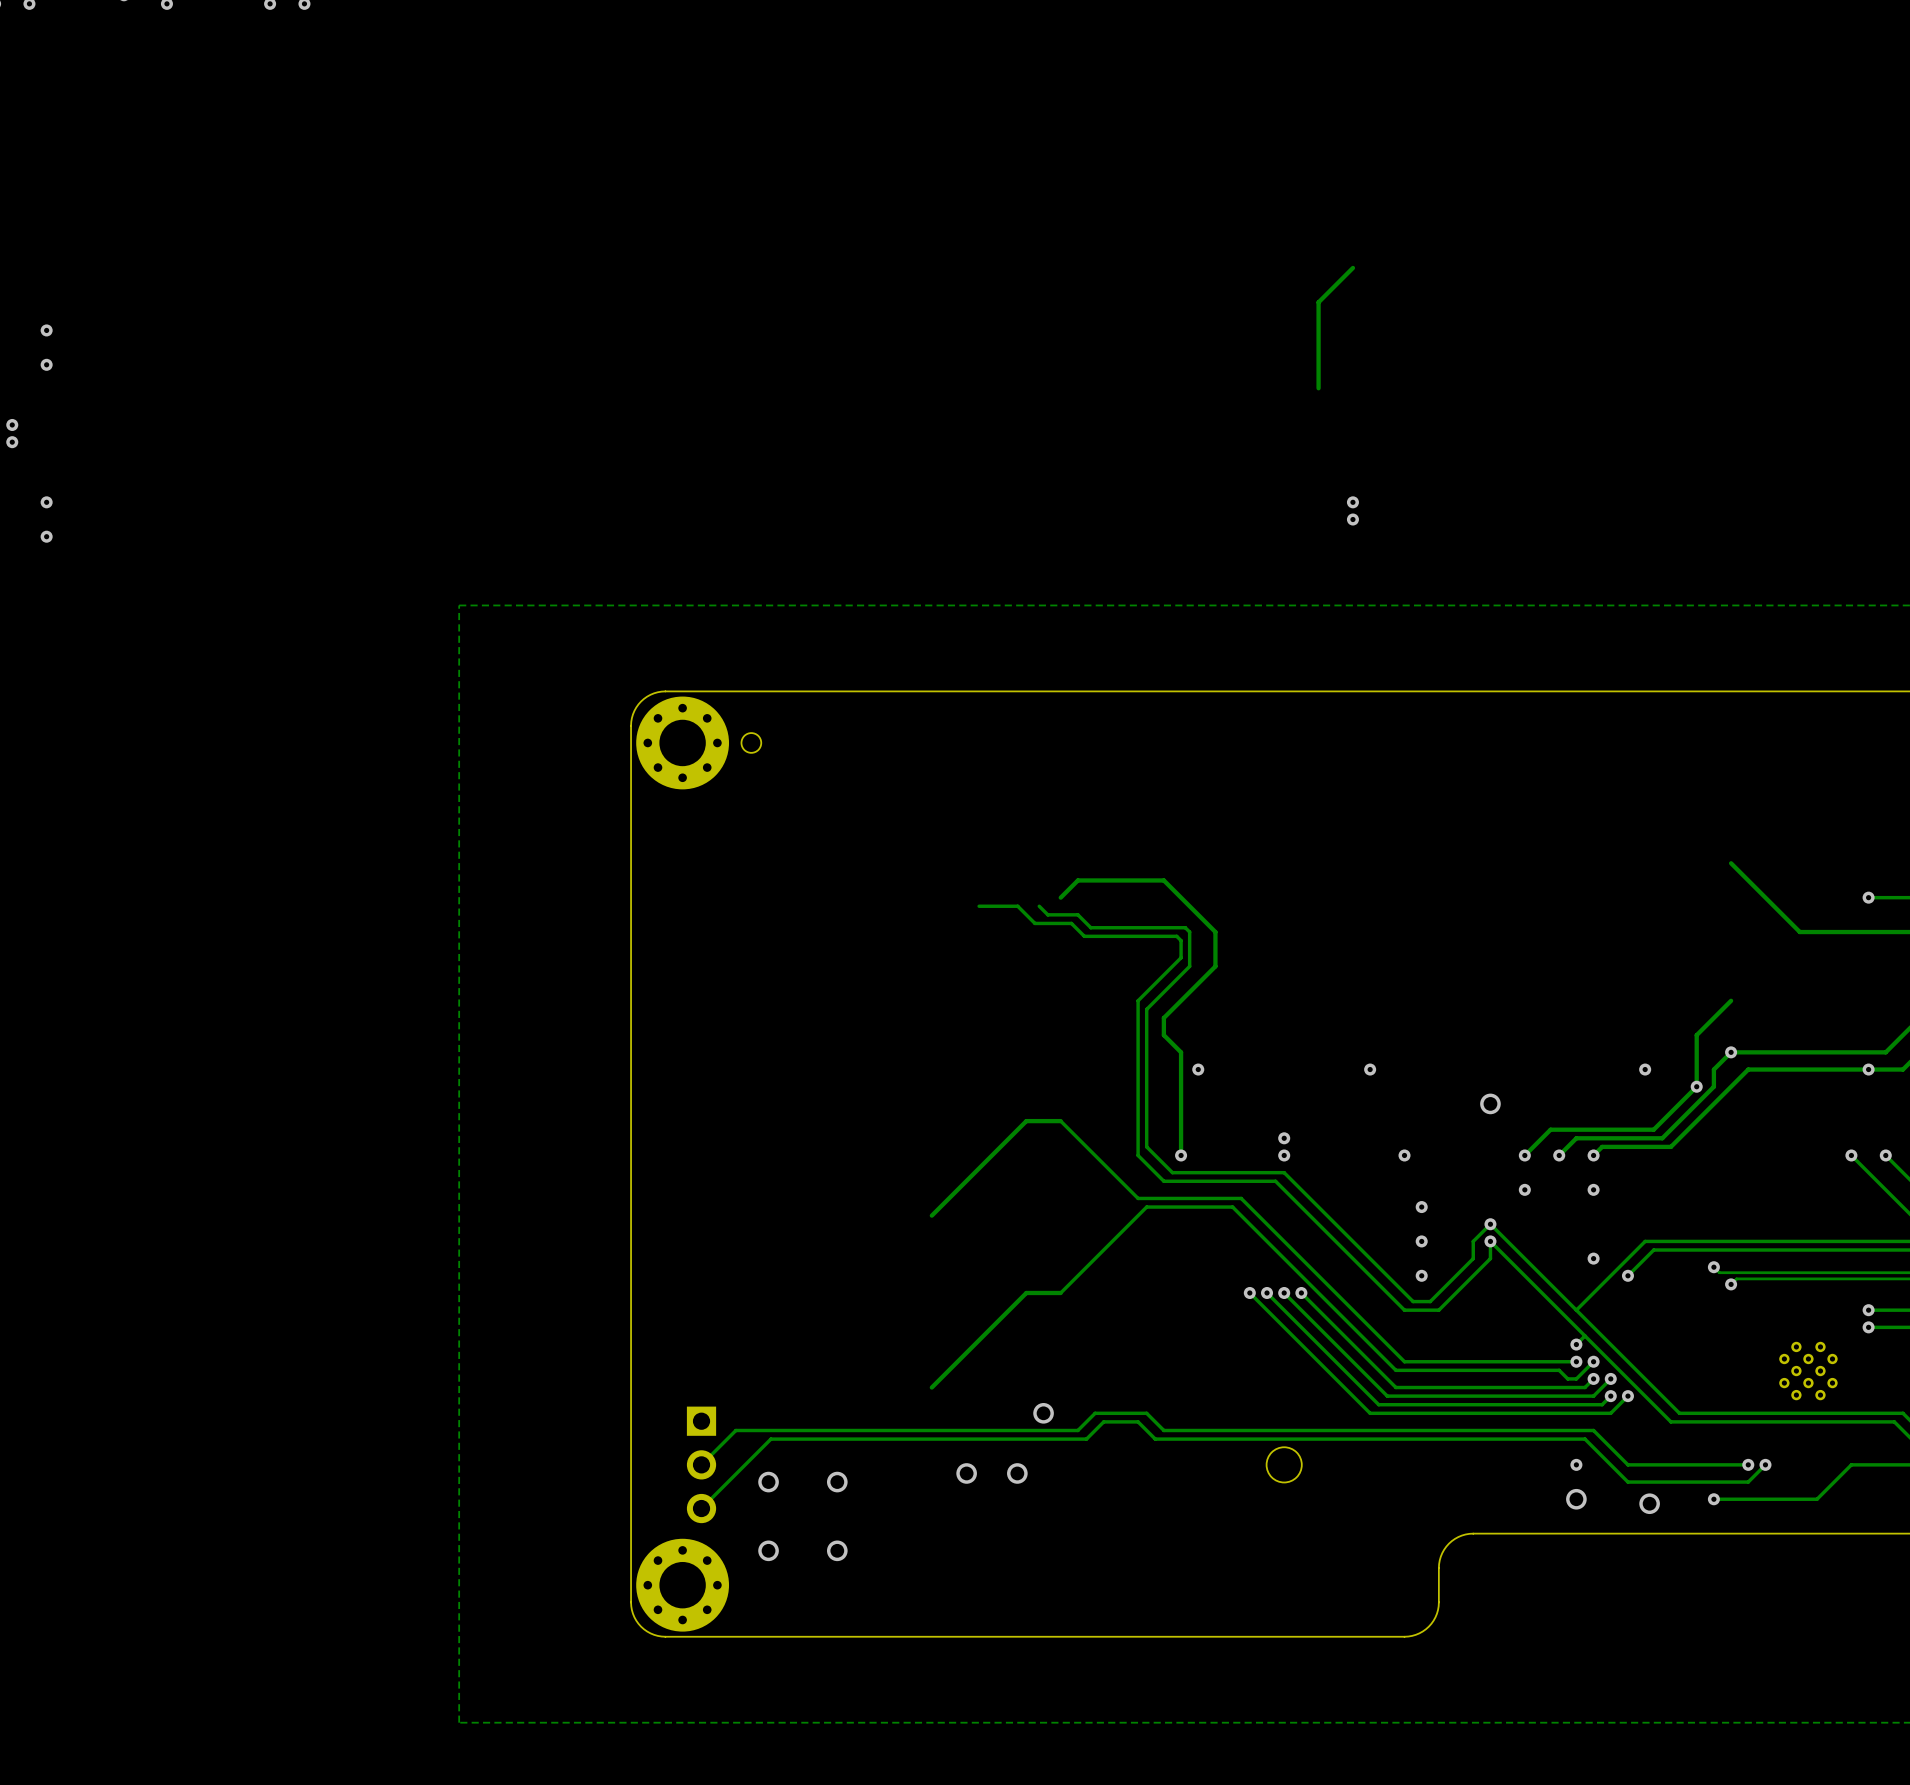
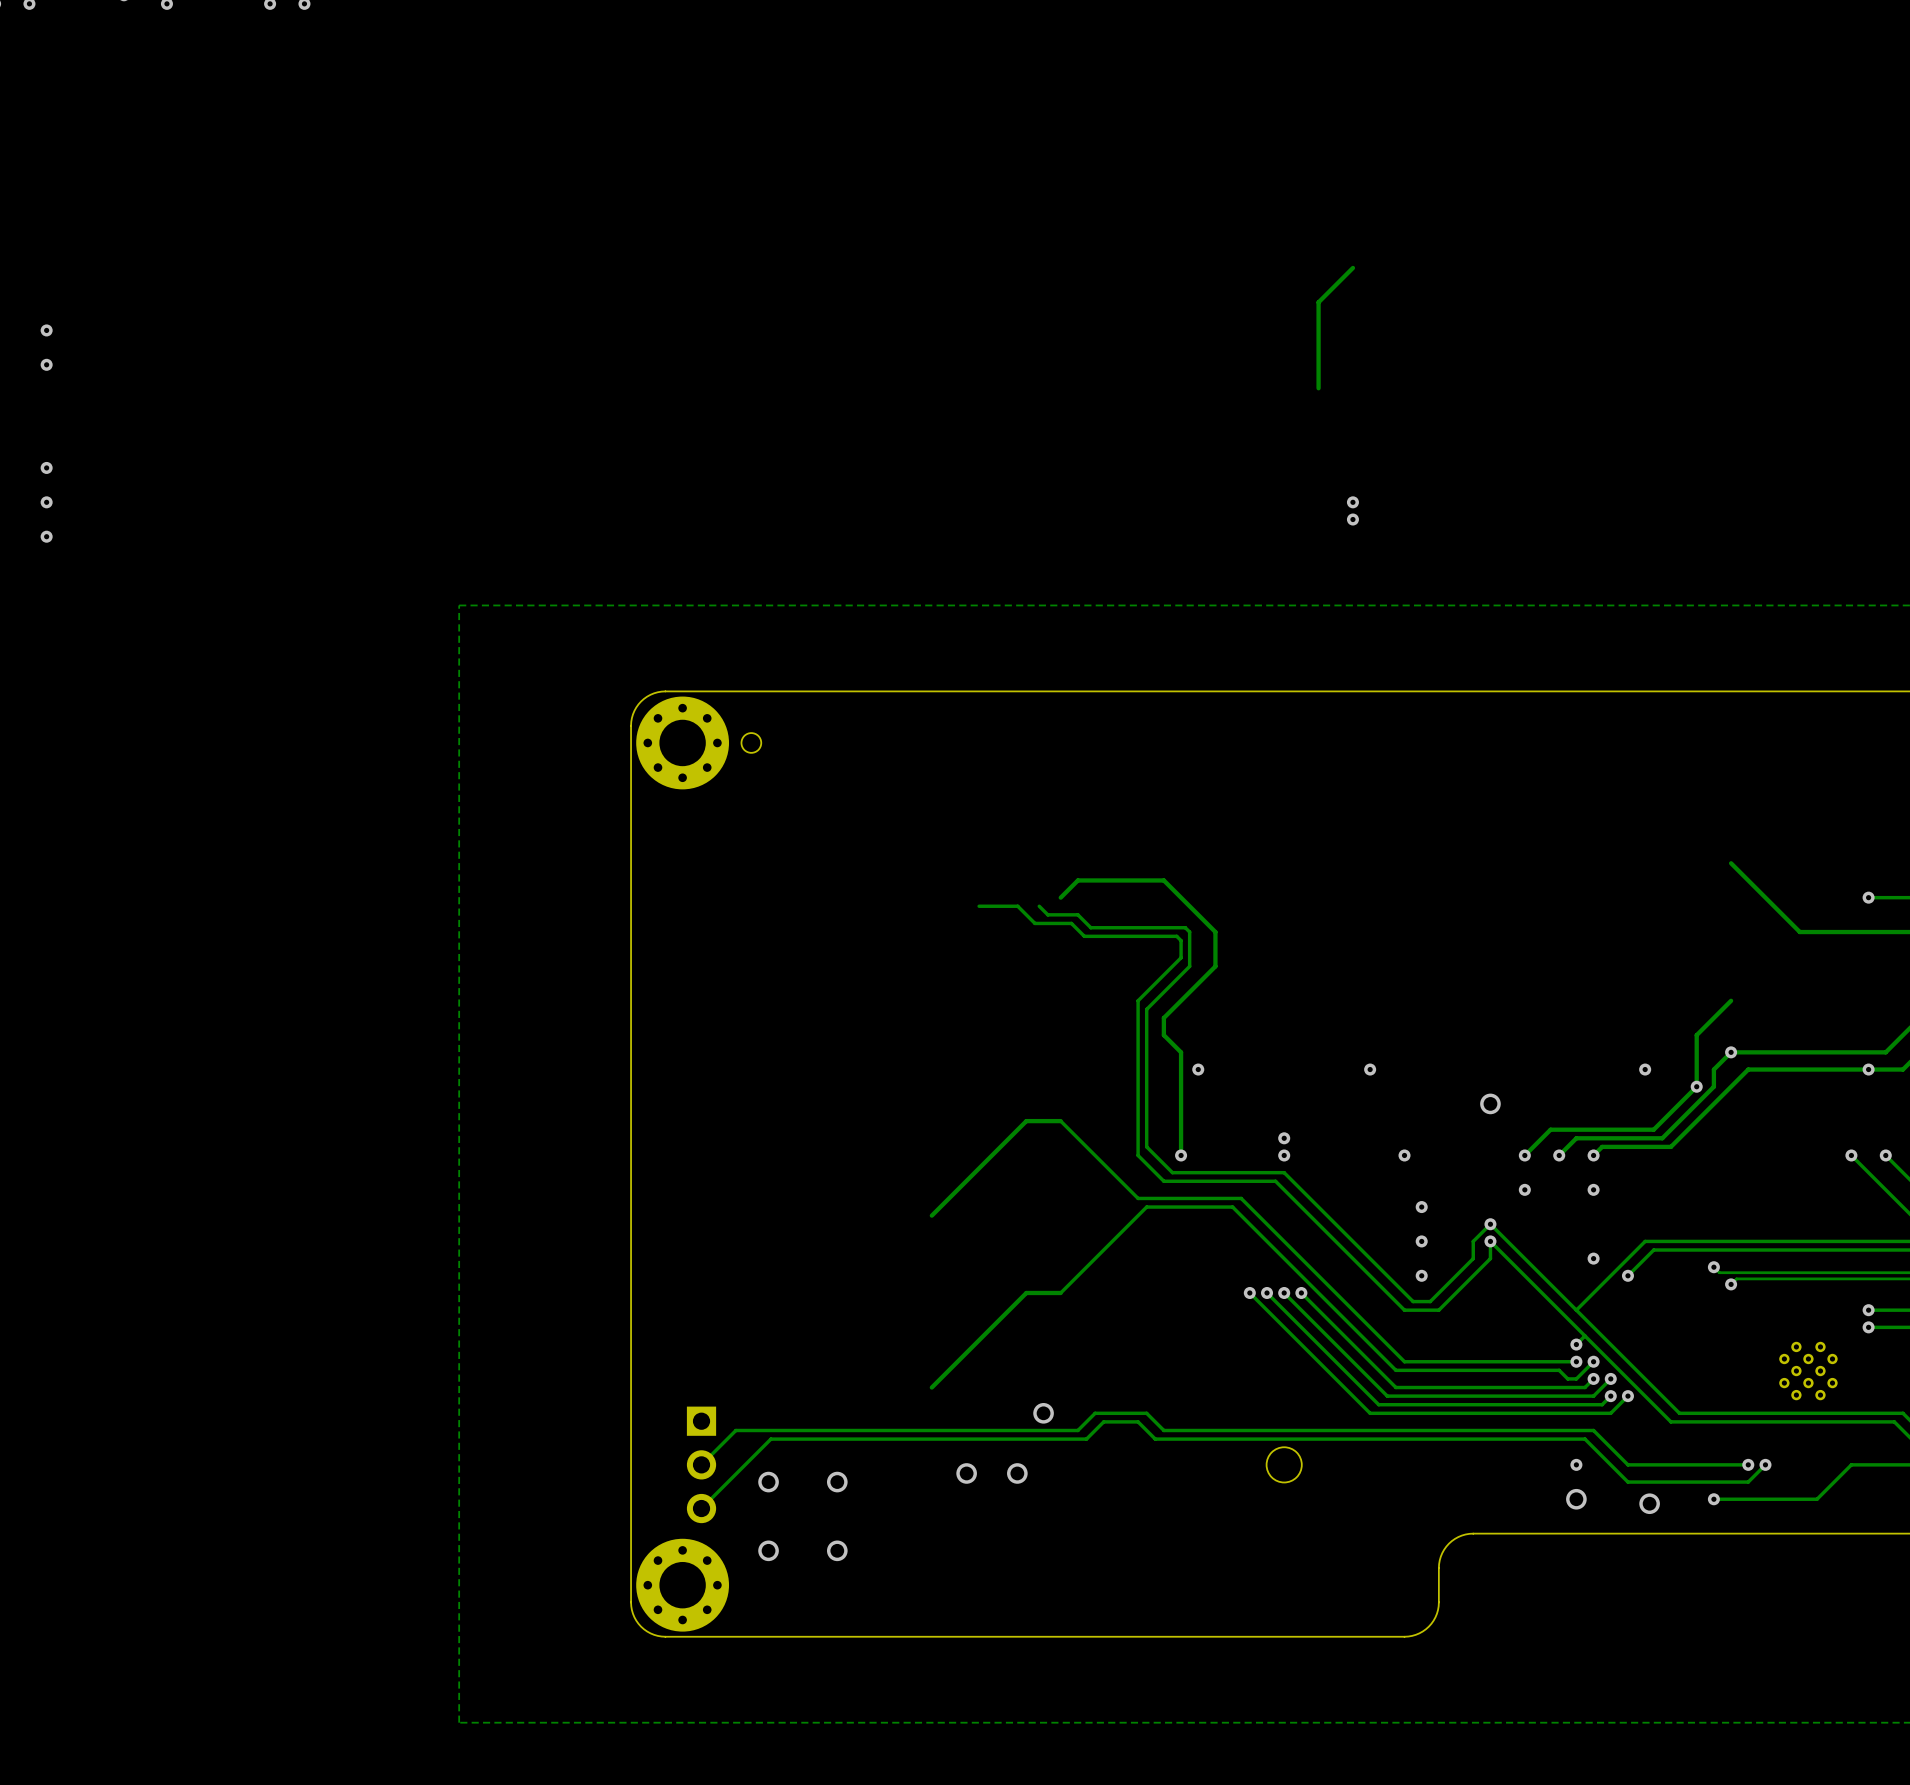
via: (12, 424) -> none
via: (12, 442) -> none
via: none -> (46, 467)

